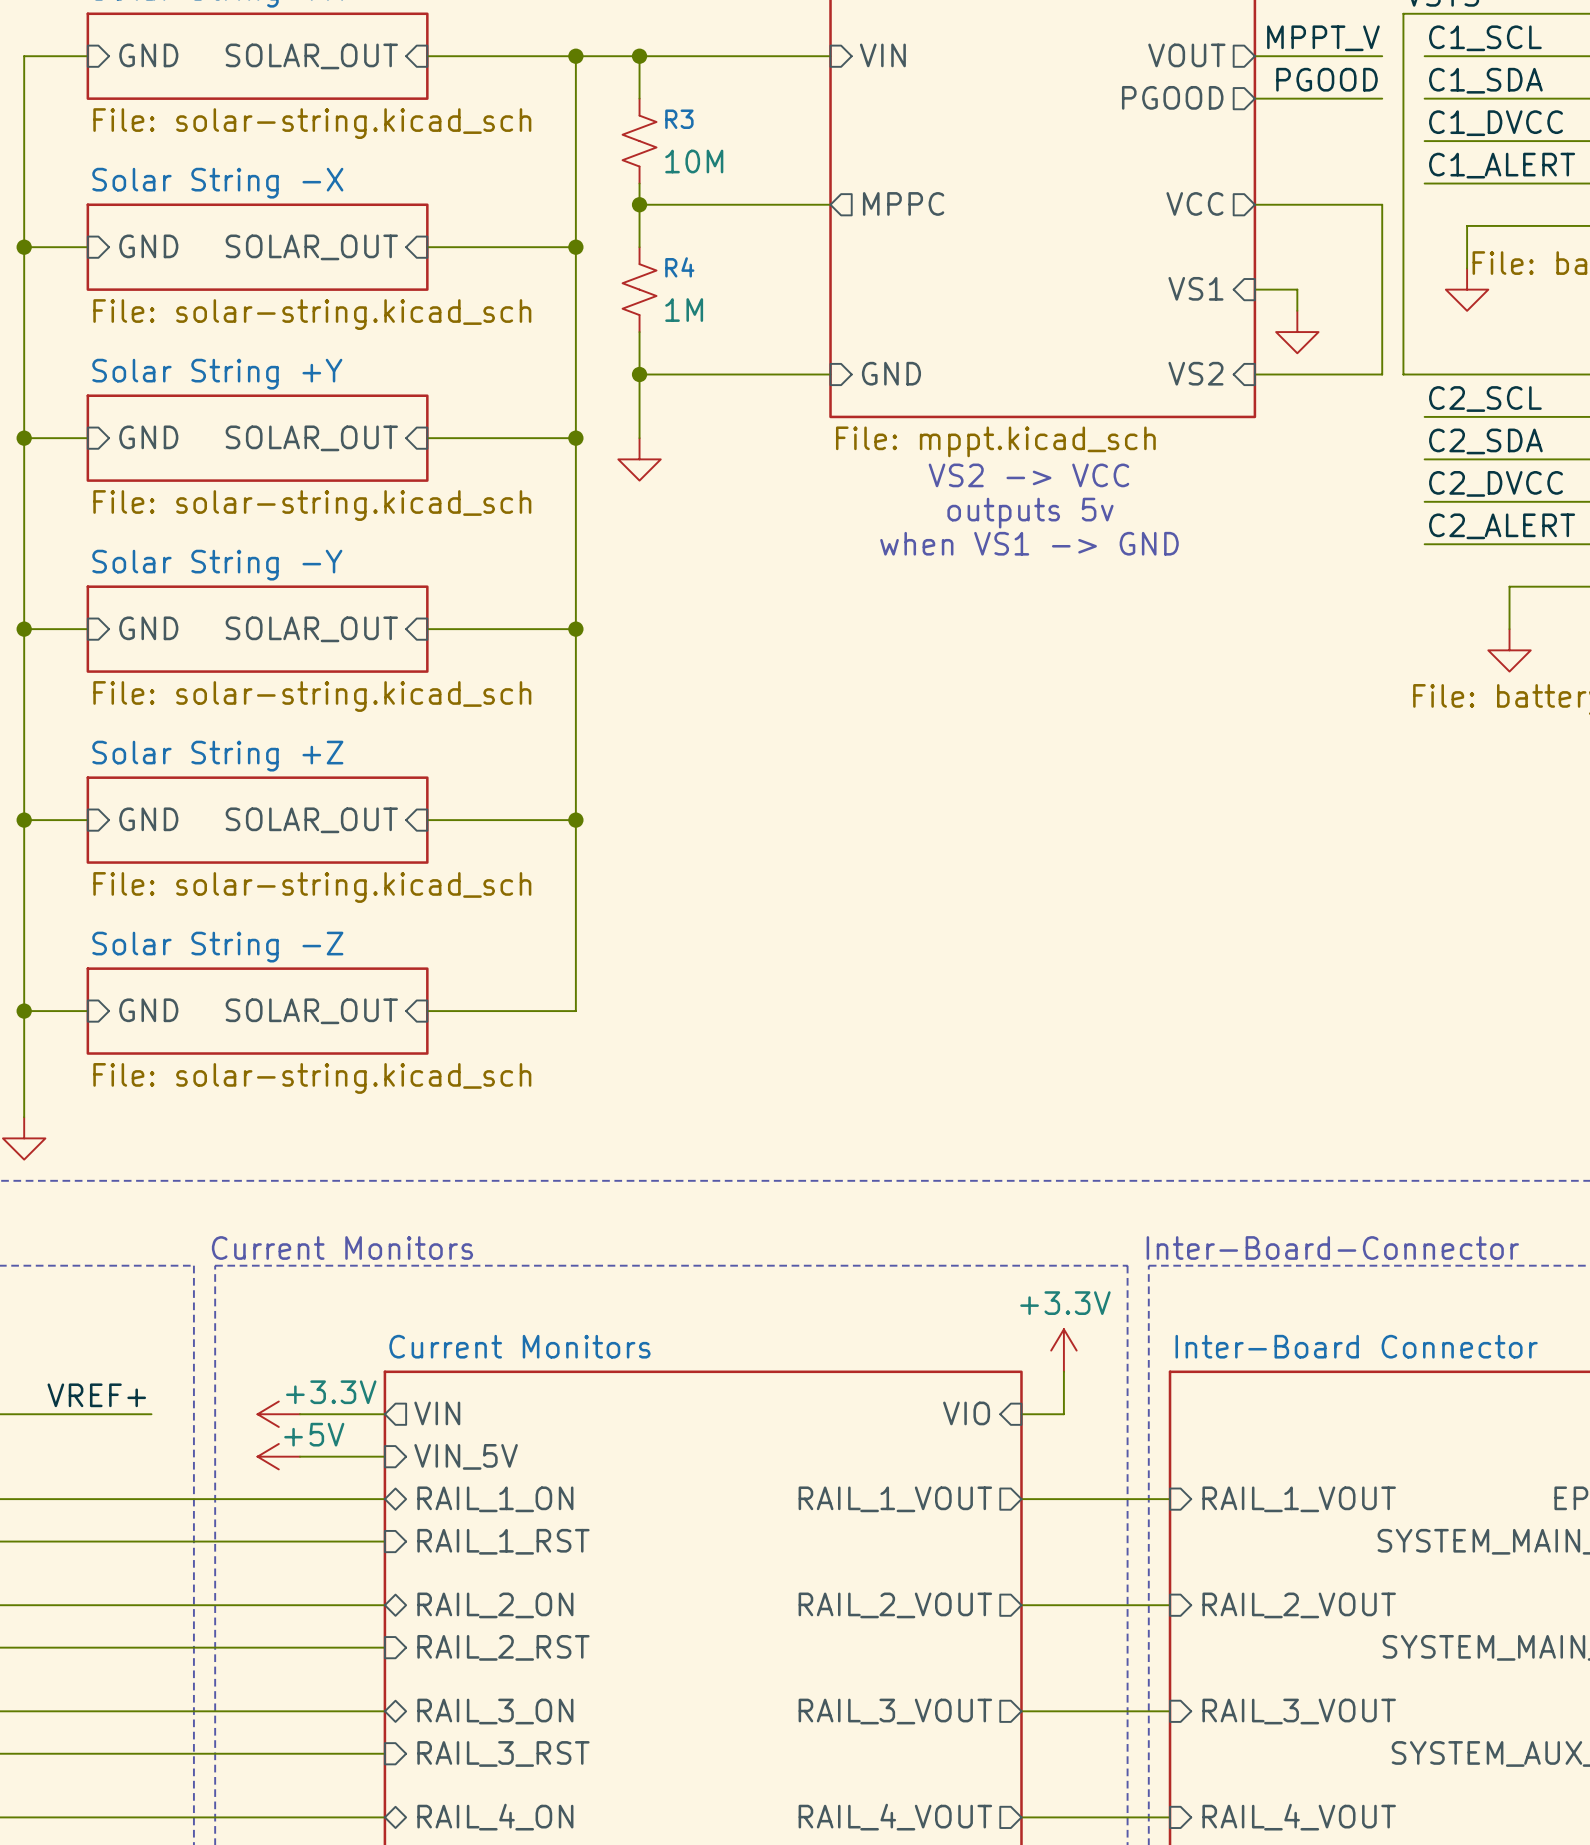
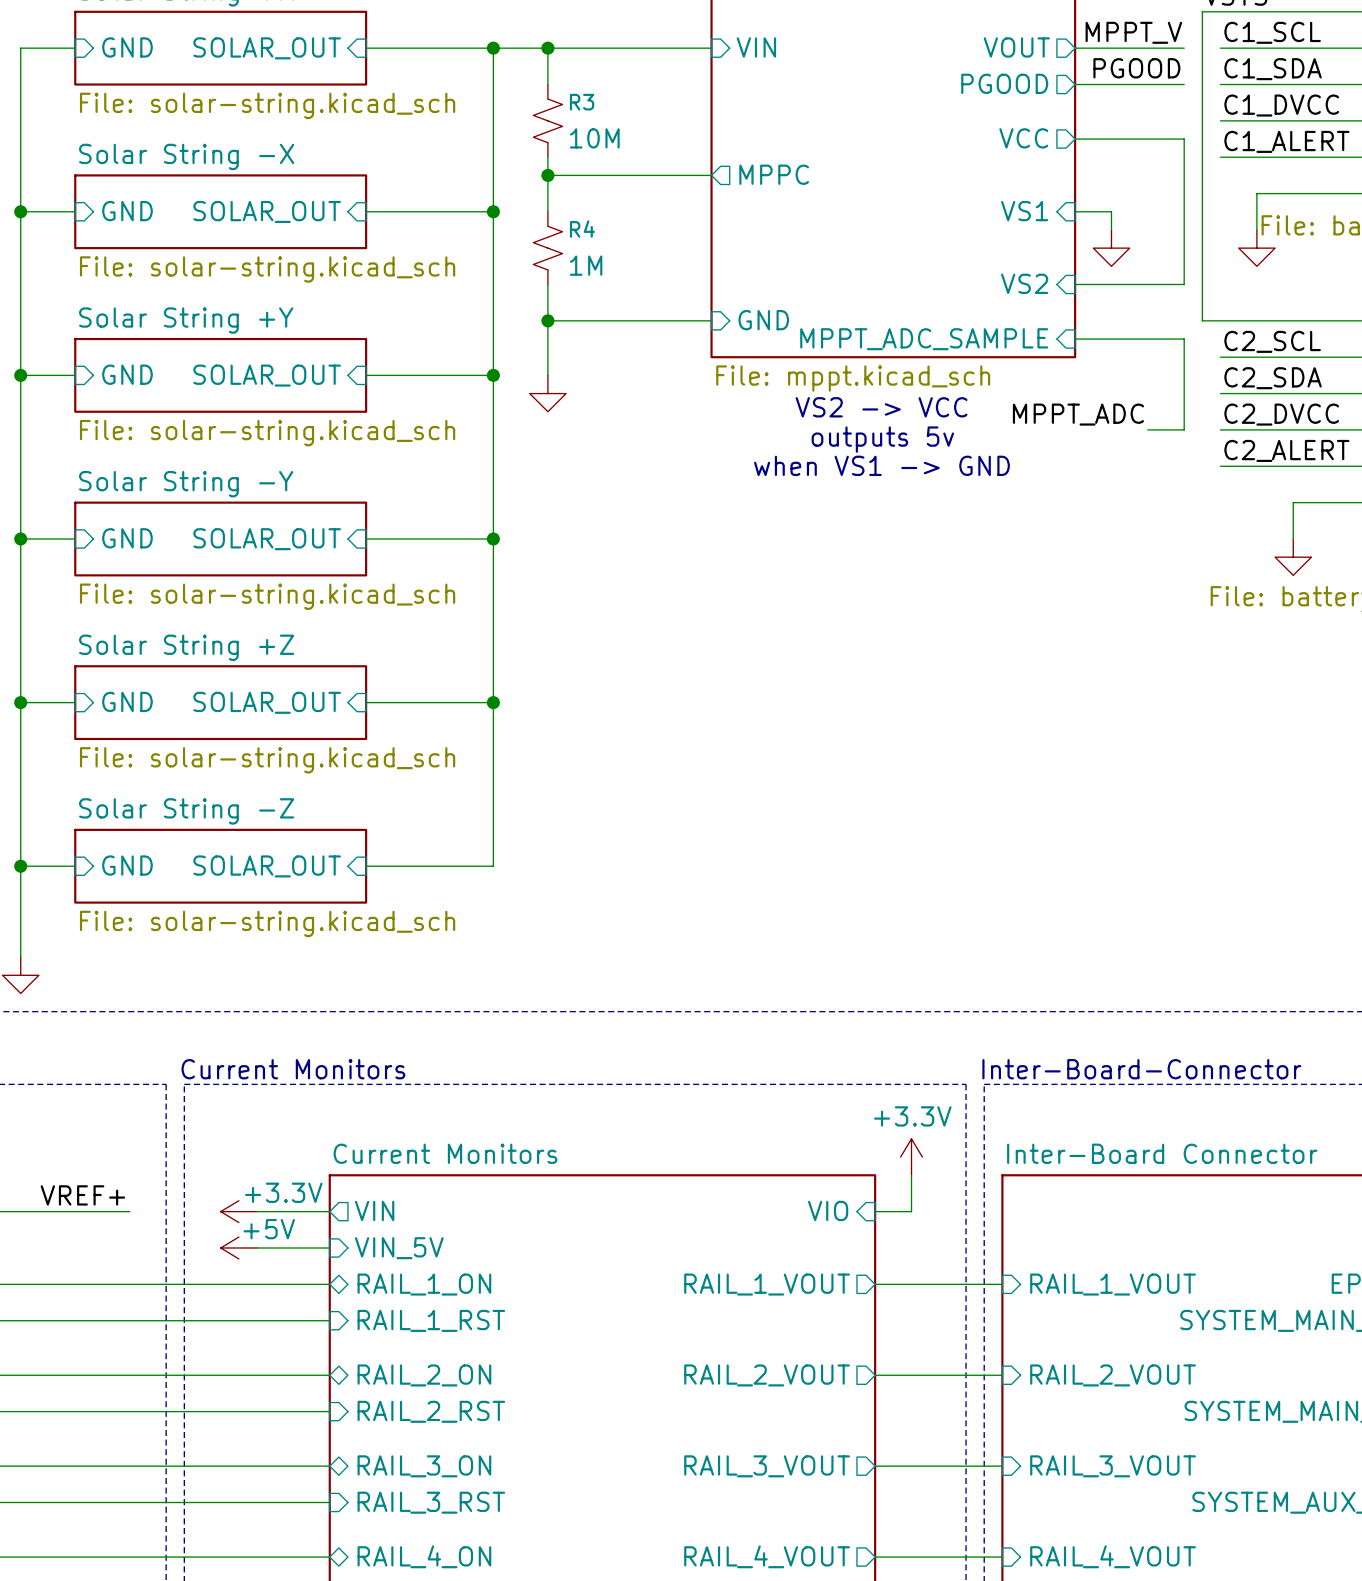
sheet pin position: VCC (1194, 203) -> VCC (1023, 138)
wire: (1254, 204) (1382, 204) -> (1075, 139) (1184, 139) (1184, 175)
sheet pin position: VS1 (1195, 288) -> VS1 (1024, 211)
wire: (1254, 289) (1297, 289) (1297, 310) -> (1075, 211) (1111, 211) (1111, 229)
power symbol position: (1297, 332) -> (1111, 248)
wire: (1382, 332) (1382, 374) (1254, 374) -> (1184, 284) (1075, 284)
sheet pin position: VS2 (1195, 373) -> VS2 (1024, 283)
sheet pin: none -> MPPT_ADC_SAMPLE (924, 339)
wire: none -> (1075, 339) (1184, 339) (1184, 429) (1147, 429)
label: none -> MPPT_ADC (1078, 414)

